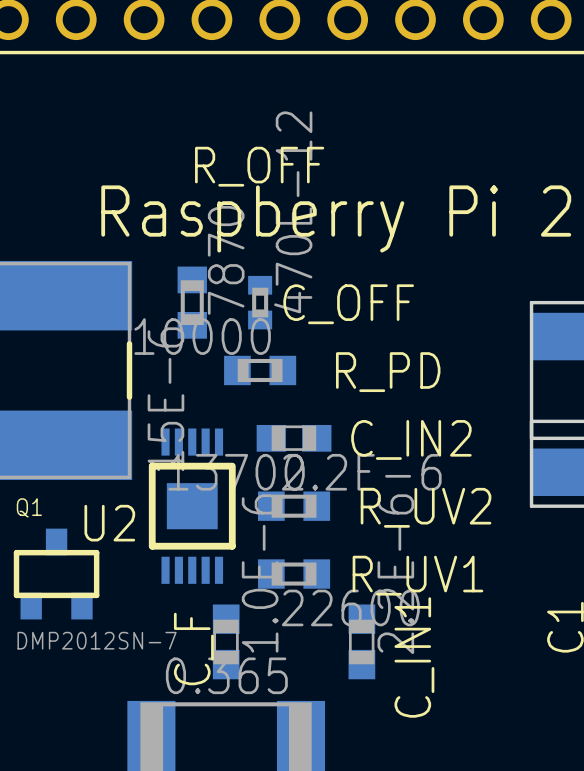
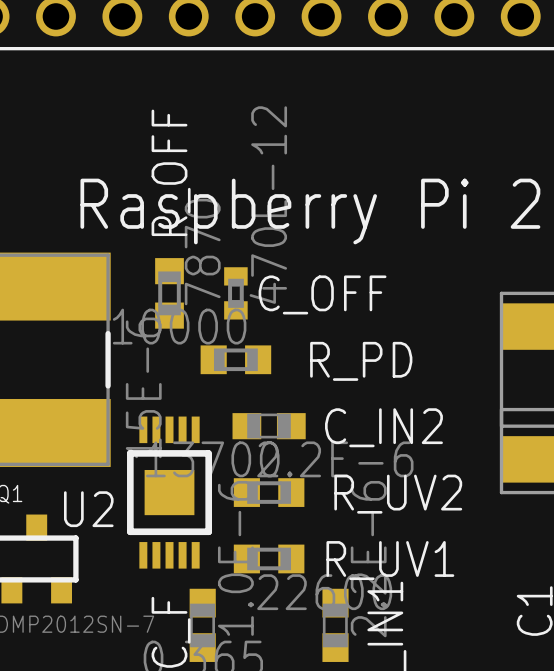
R_OFF name rotation: 0° (259, 166) -> 90° counterclockwise (171, 172)

